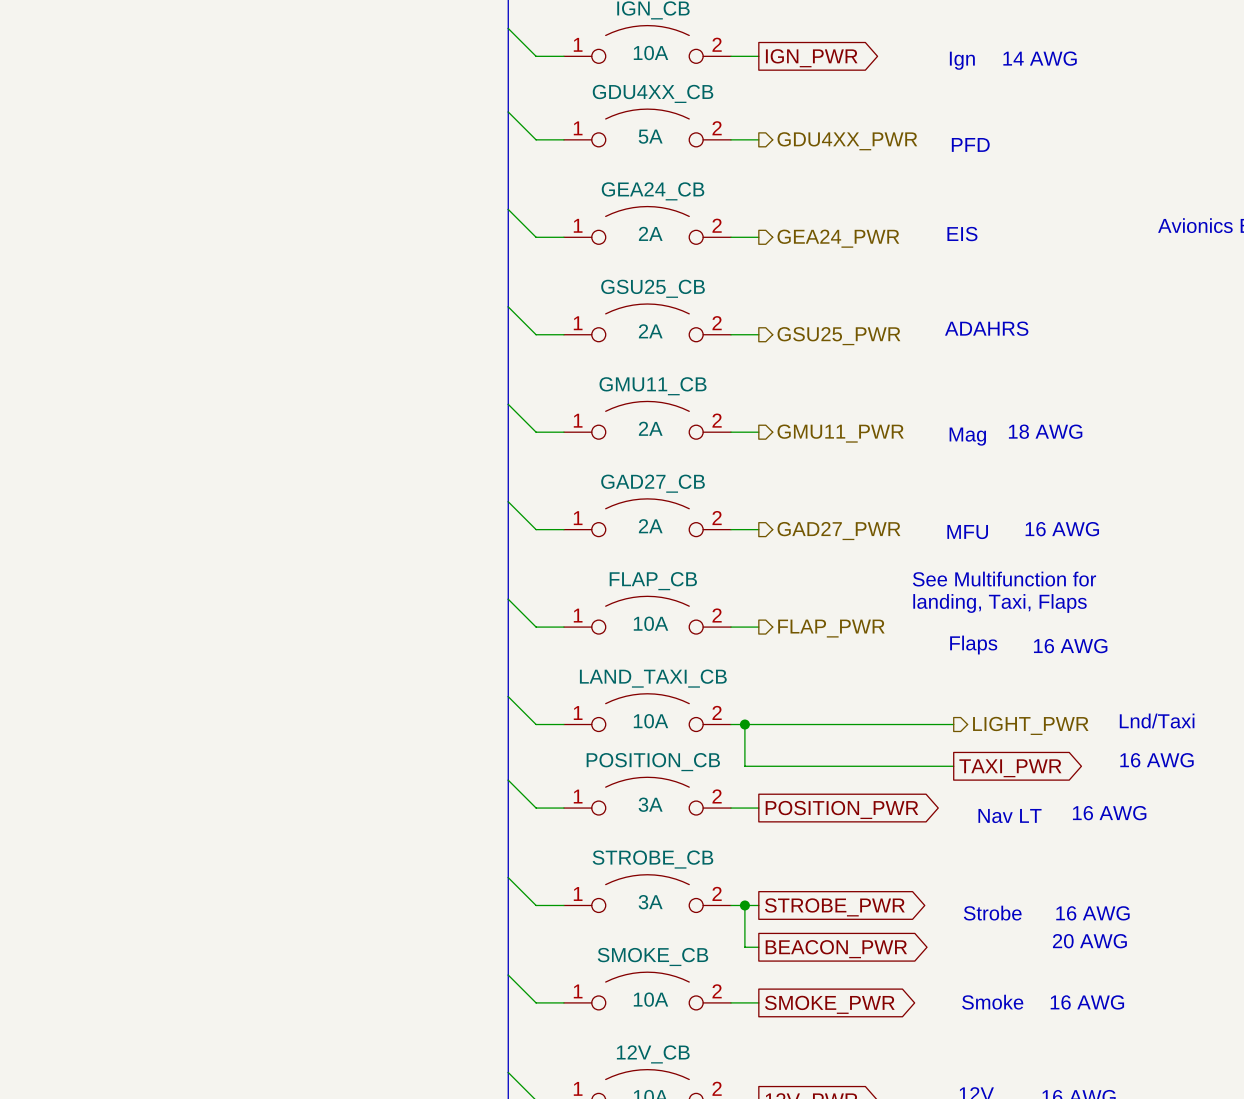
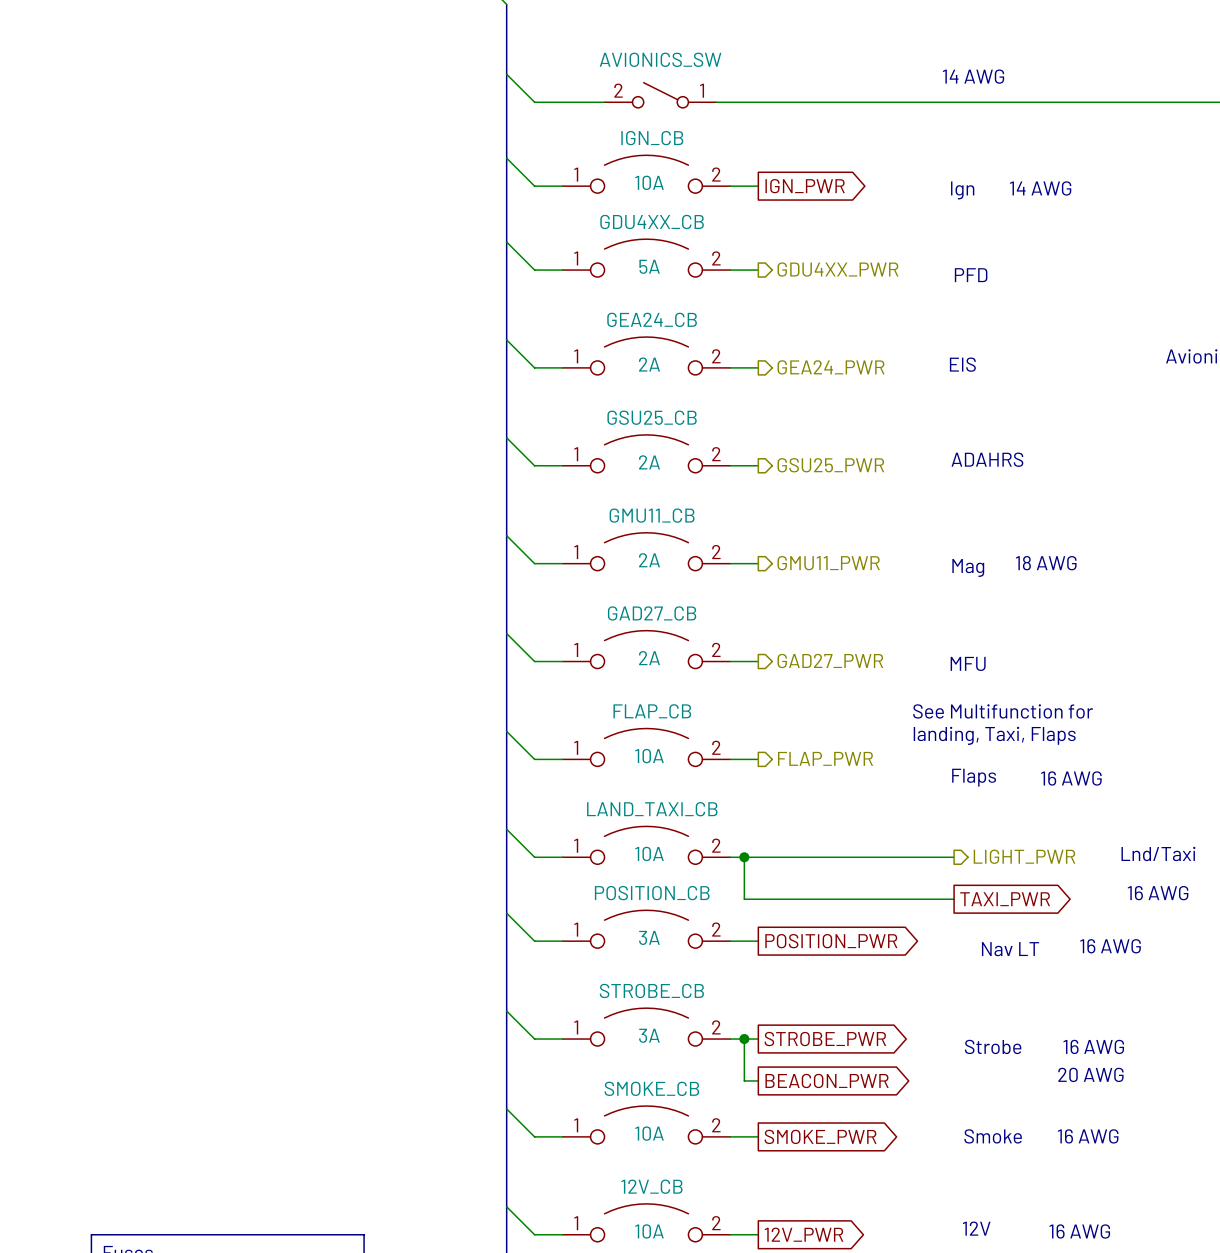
text: 16 AWG (1062, 529) -> none

